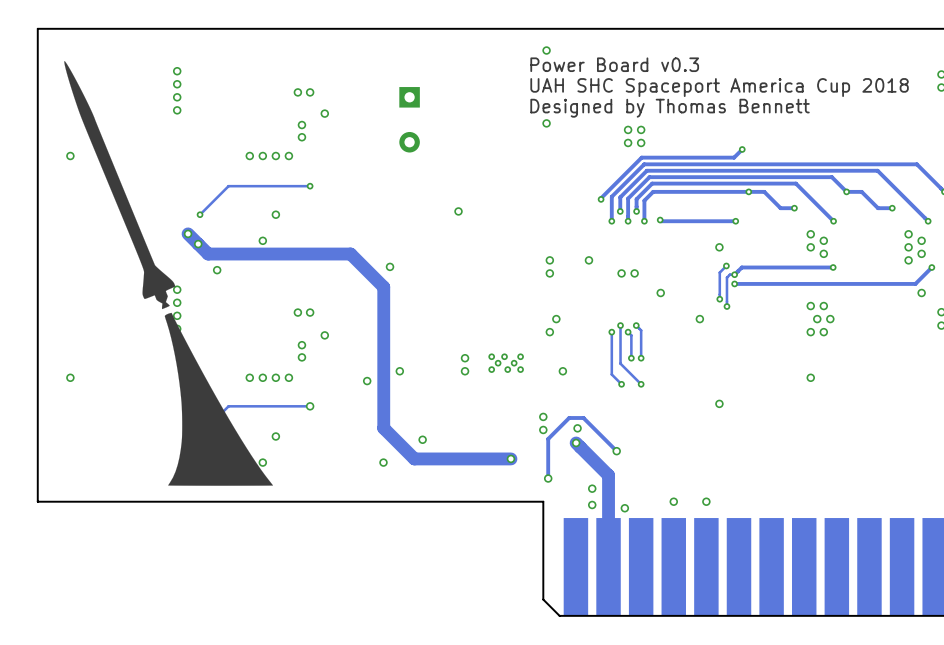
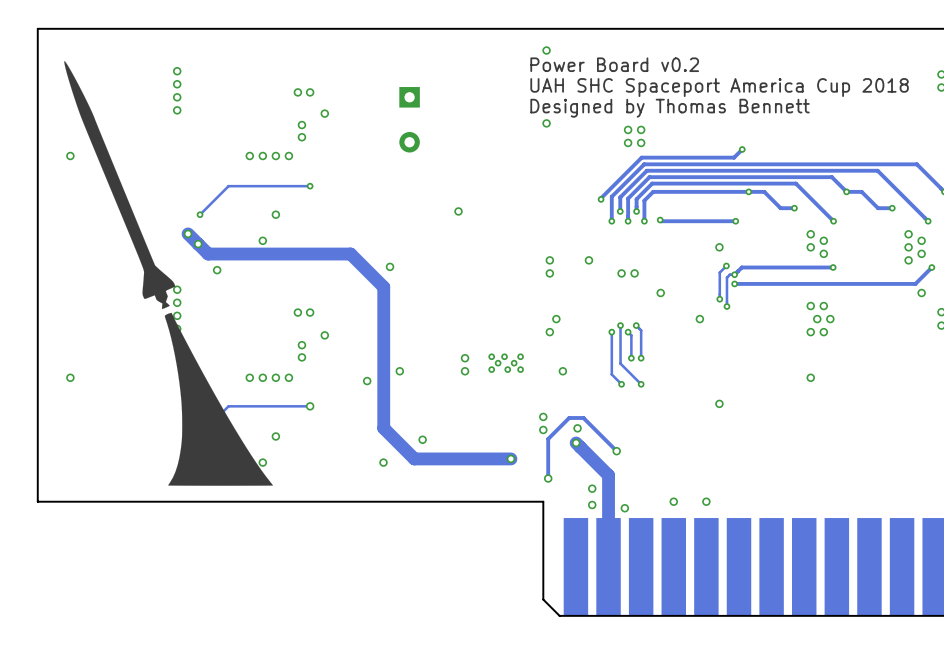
text: Power Board v0.3 (614, 64) -> Power Board v0.2 (614, 64)

